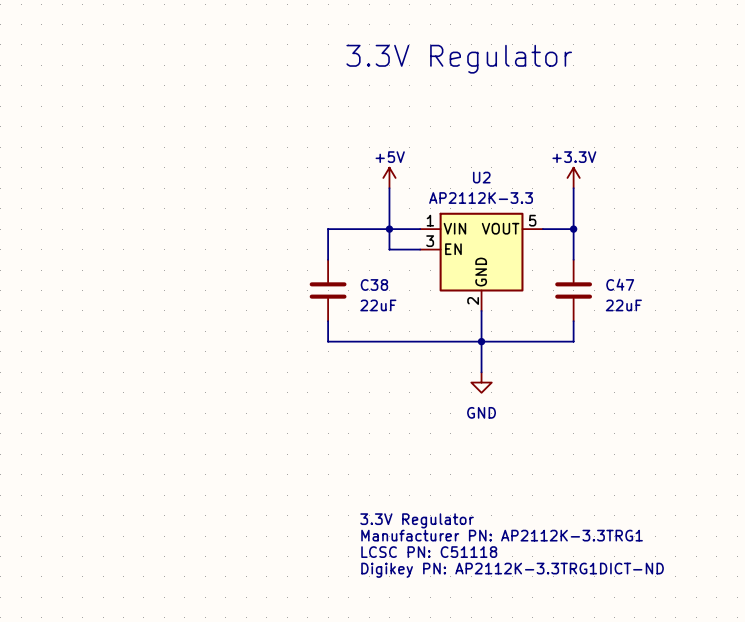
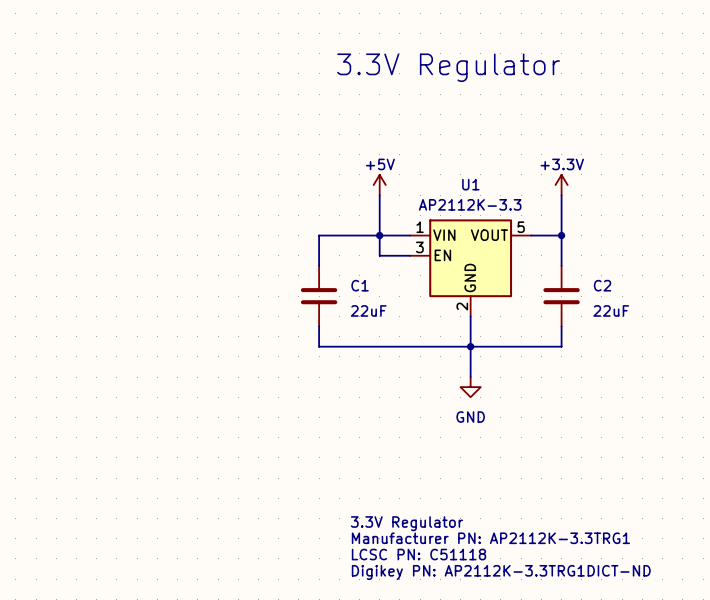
U2 name: U2 (481, 177) -> U1 (470, 184)
C38 name: C38 (374, 284) -> C1 (360, 285)
C47 name: C47 (620, 284) -> C2 (602, 285)

